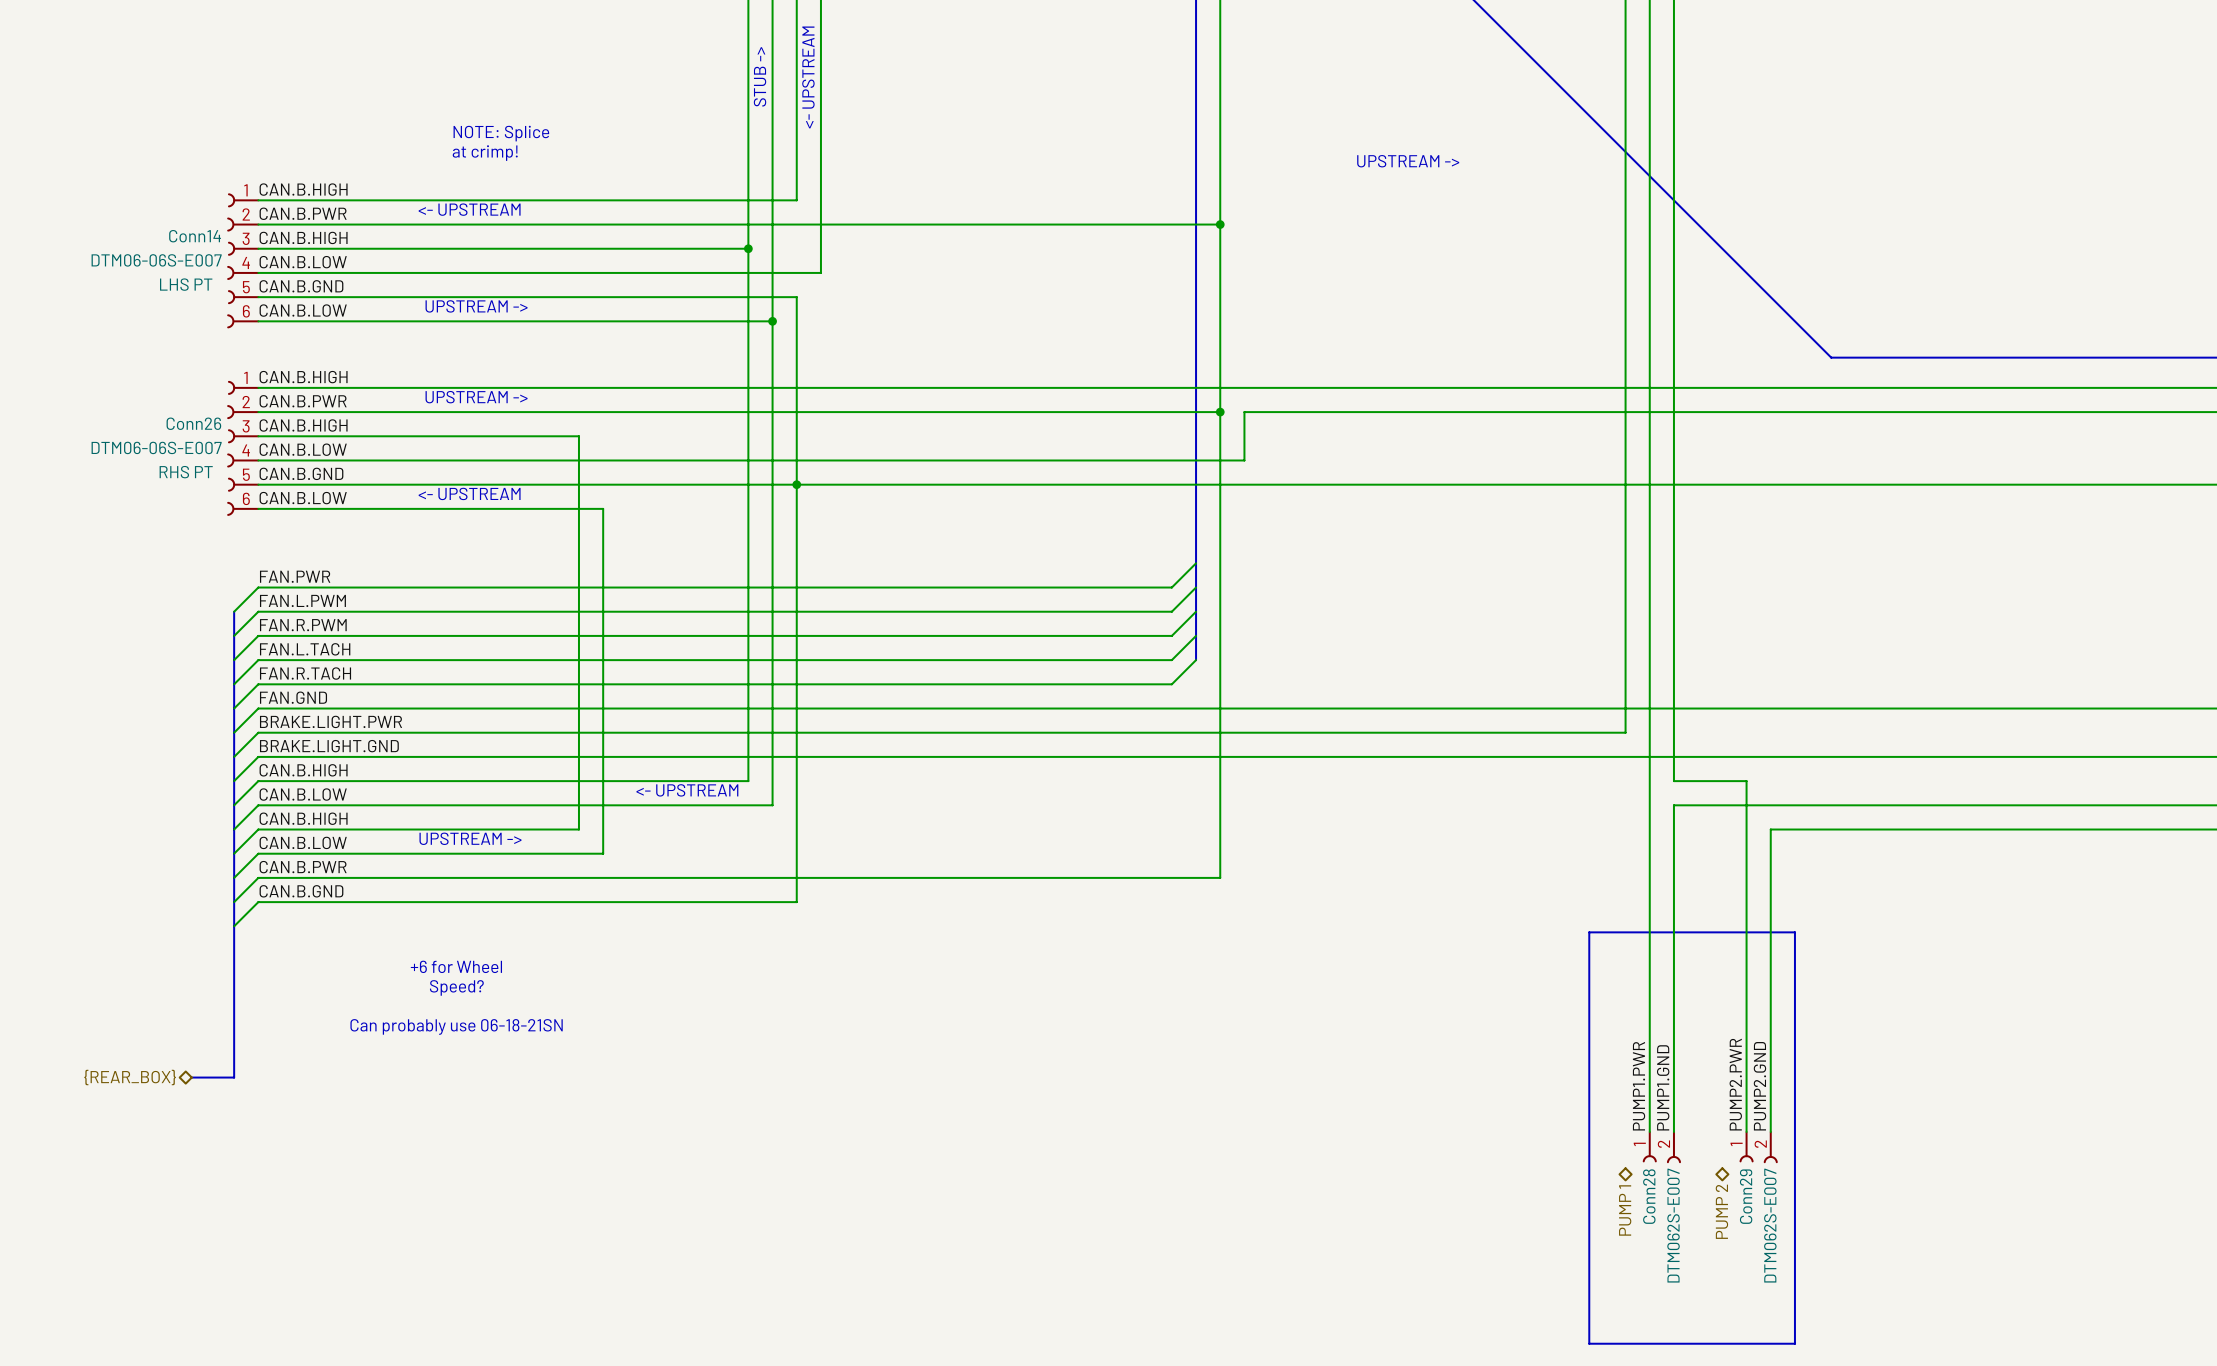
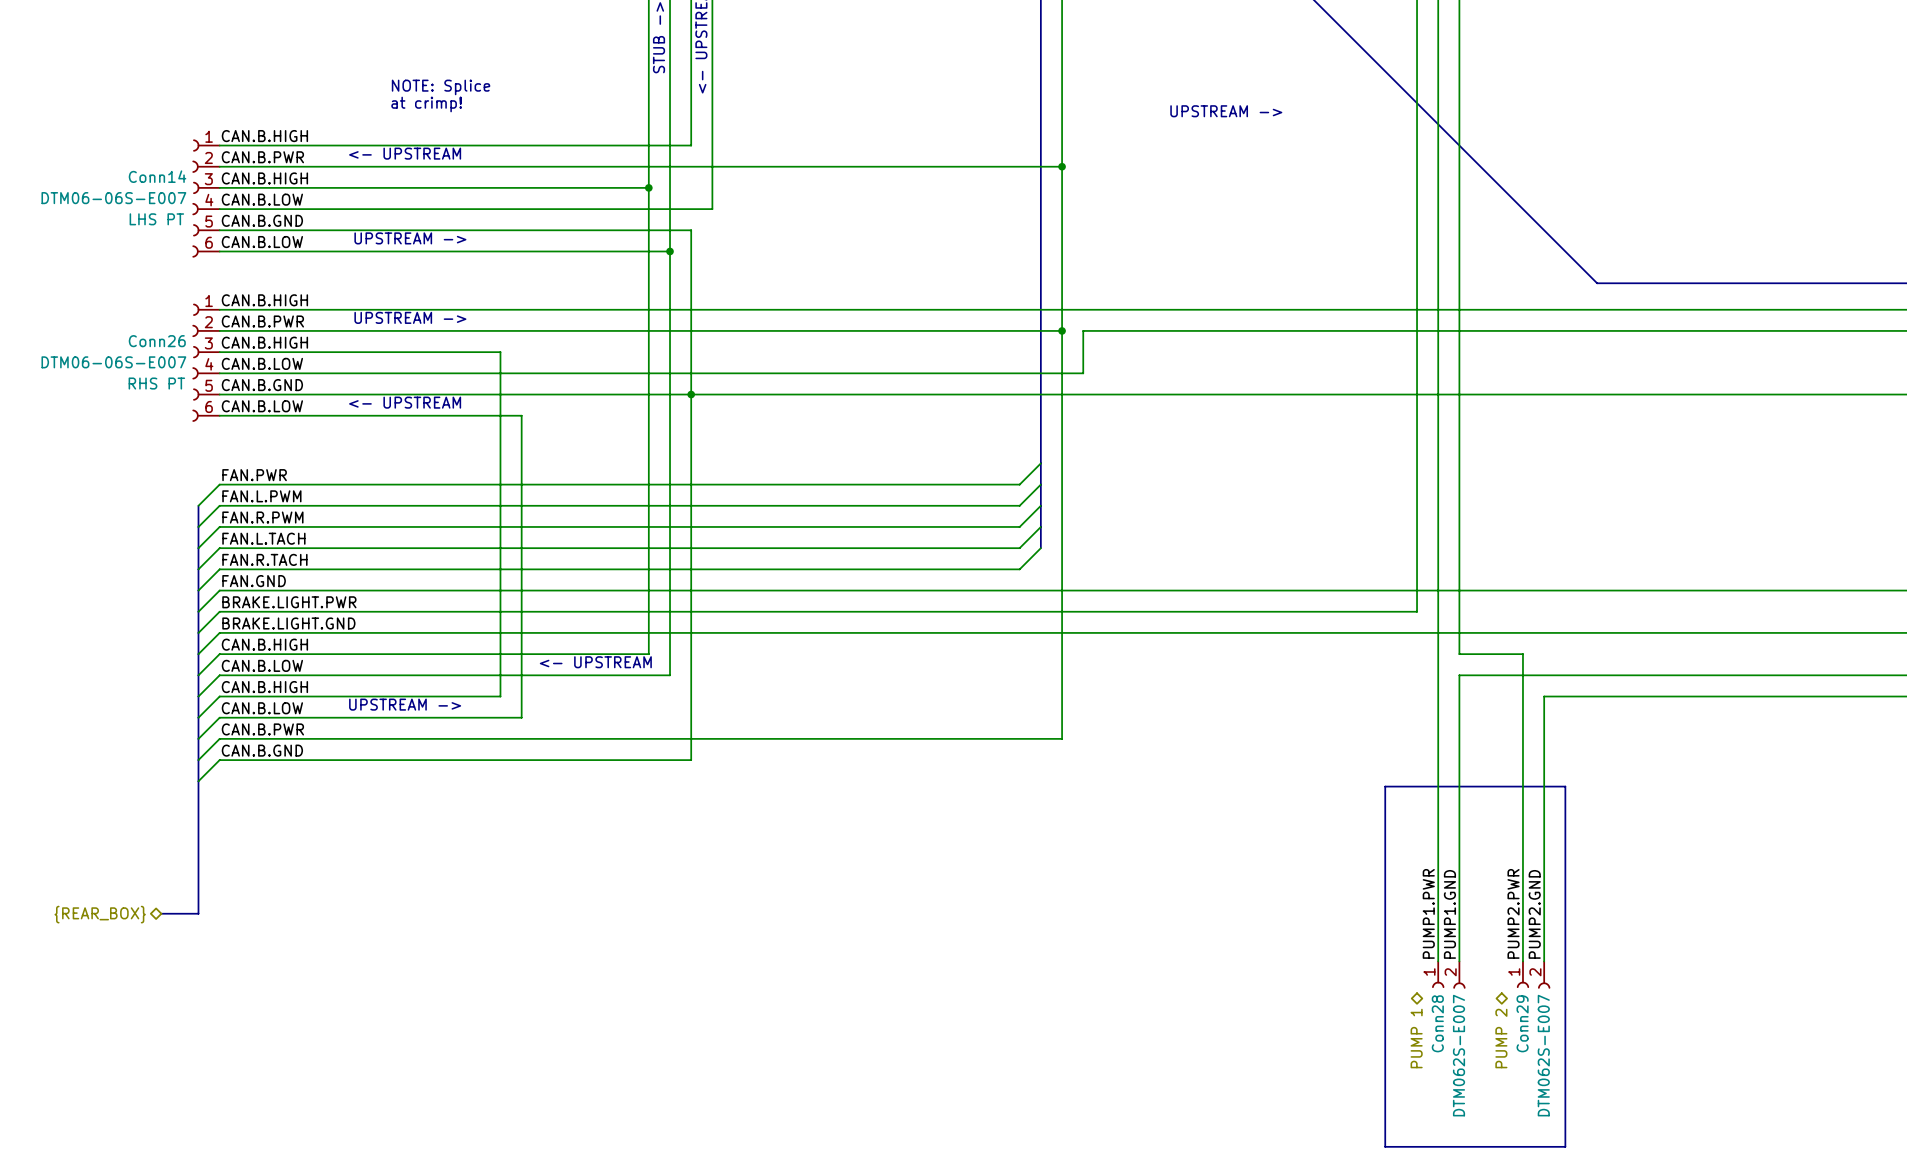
text: +6 for Wheel (456, 966) -> none
text: Speed? (456, 987) -> none
text: Can probably use 06-18-21SN (456, 1026) -> none

